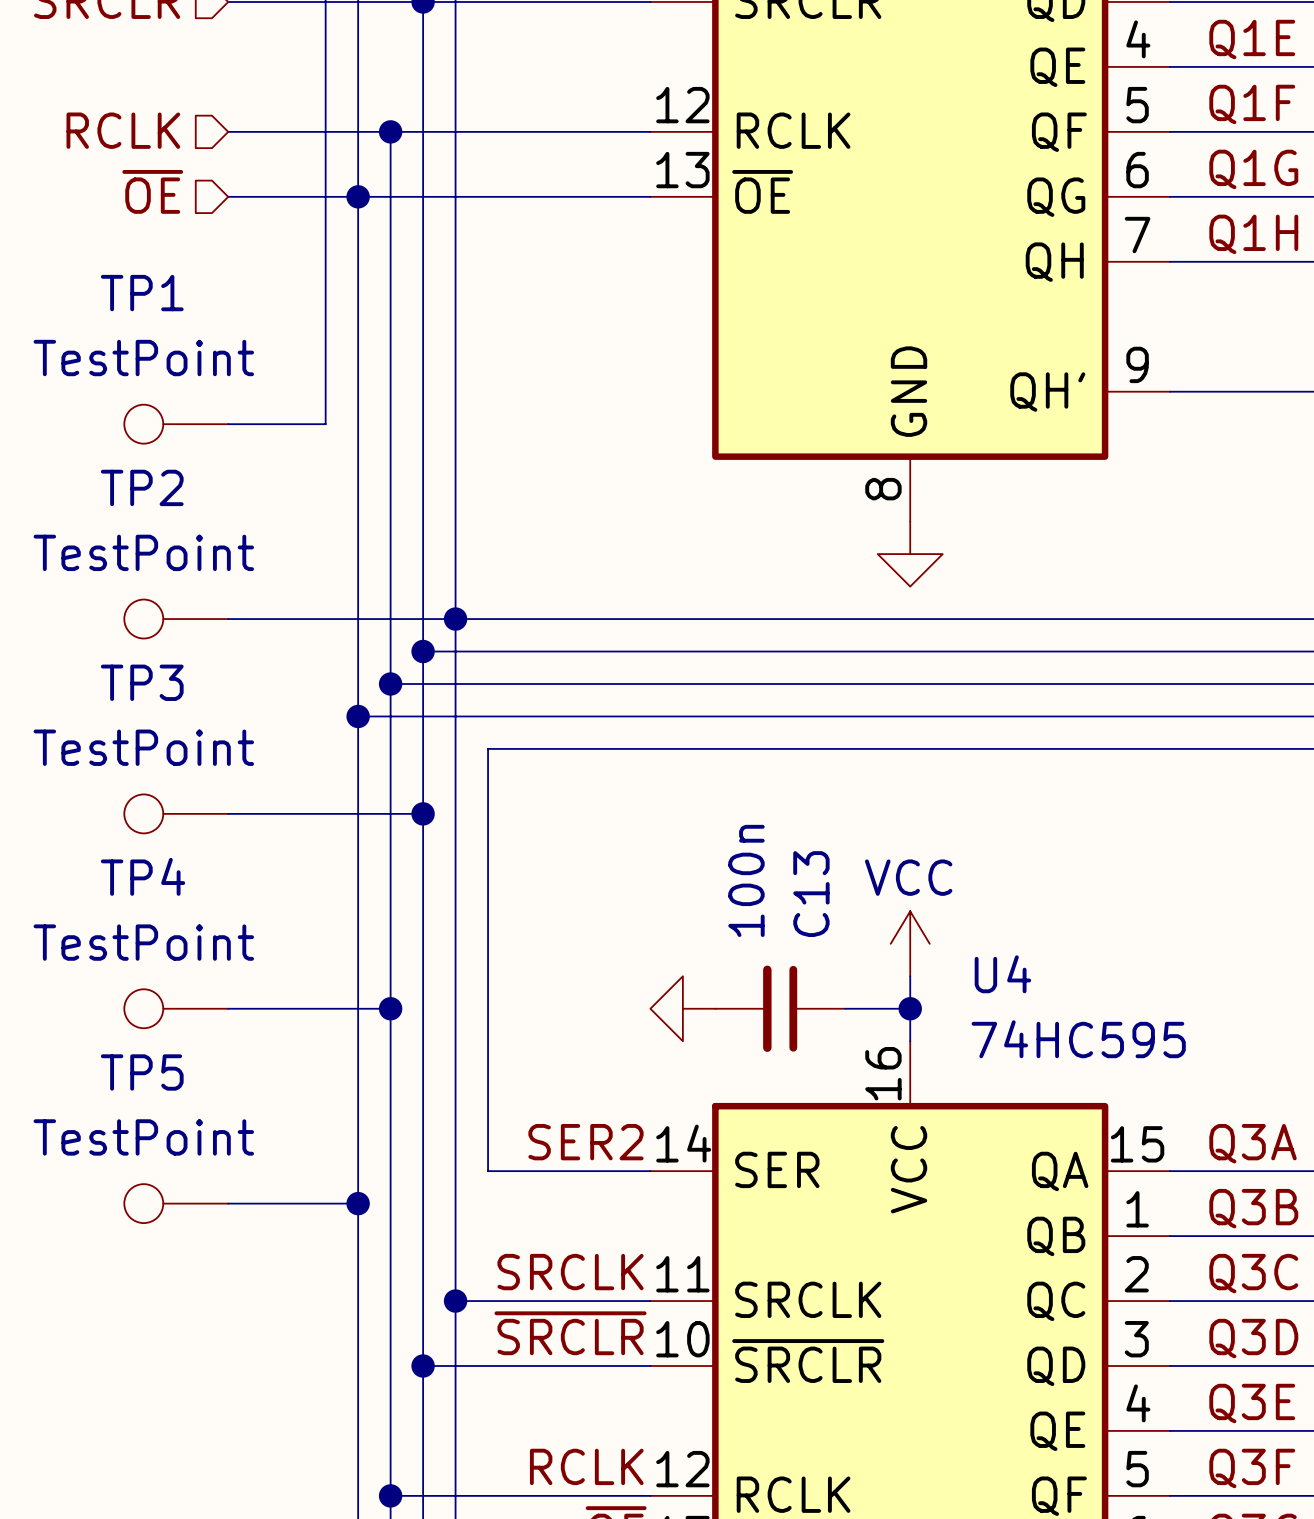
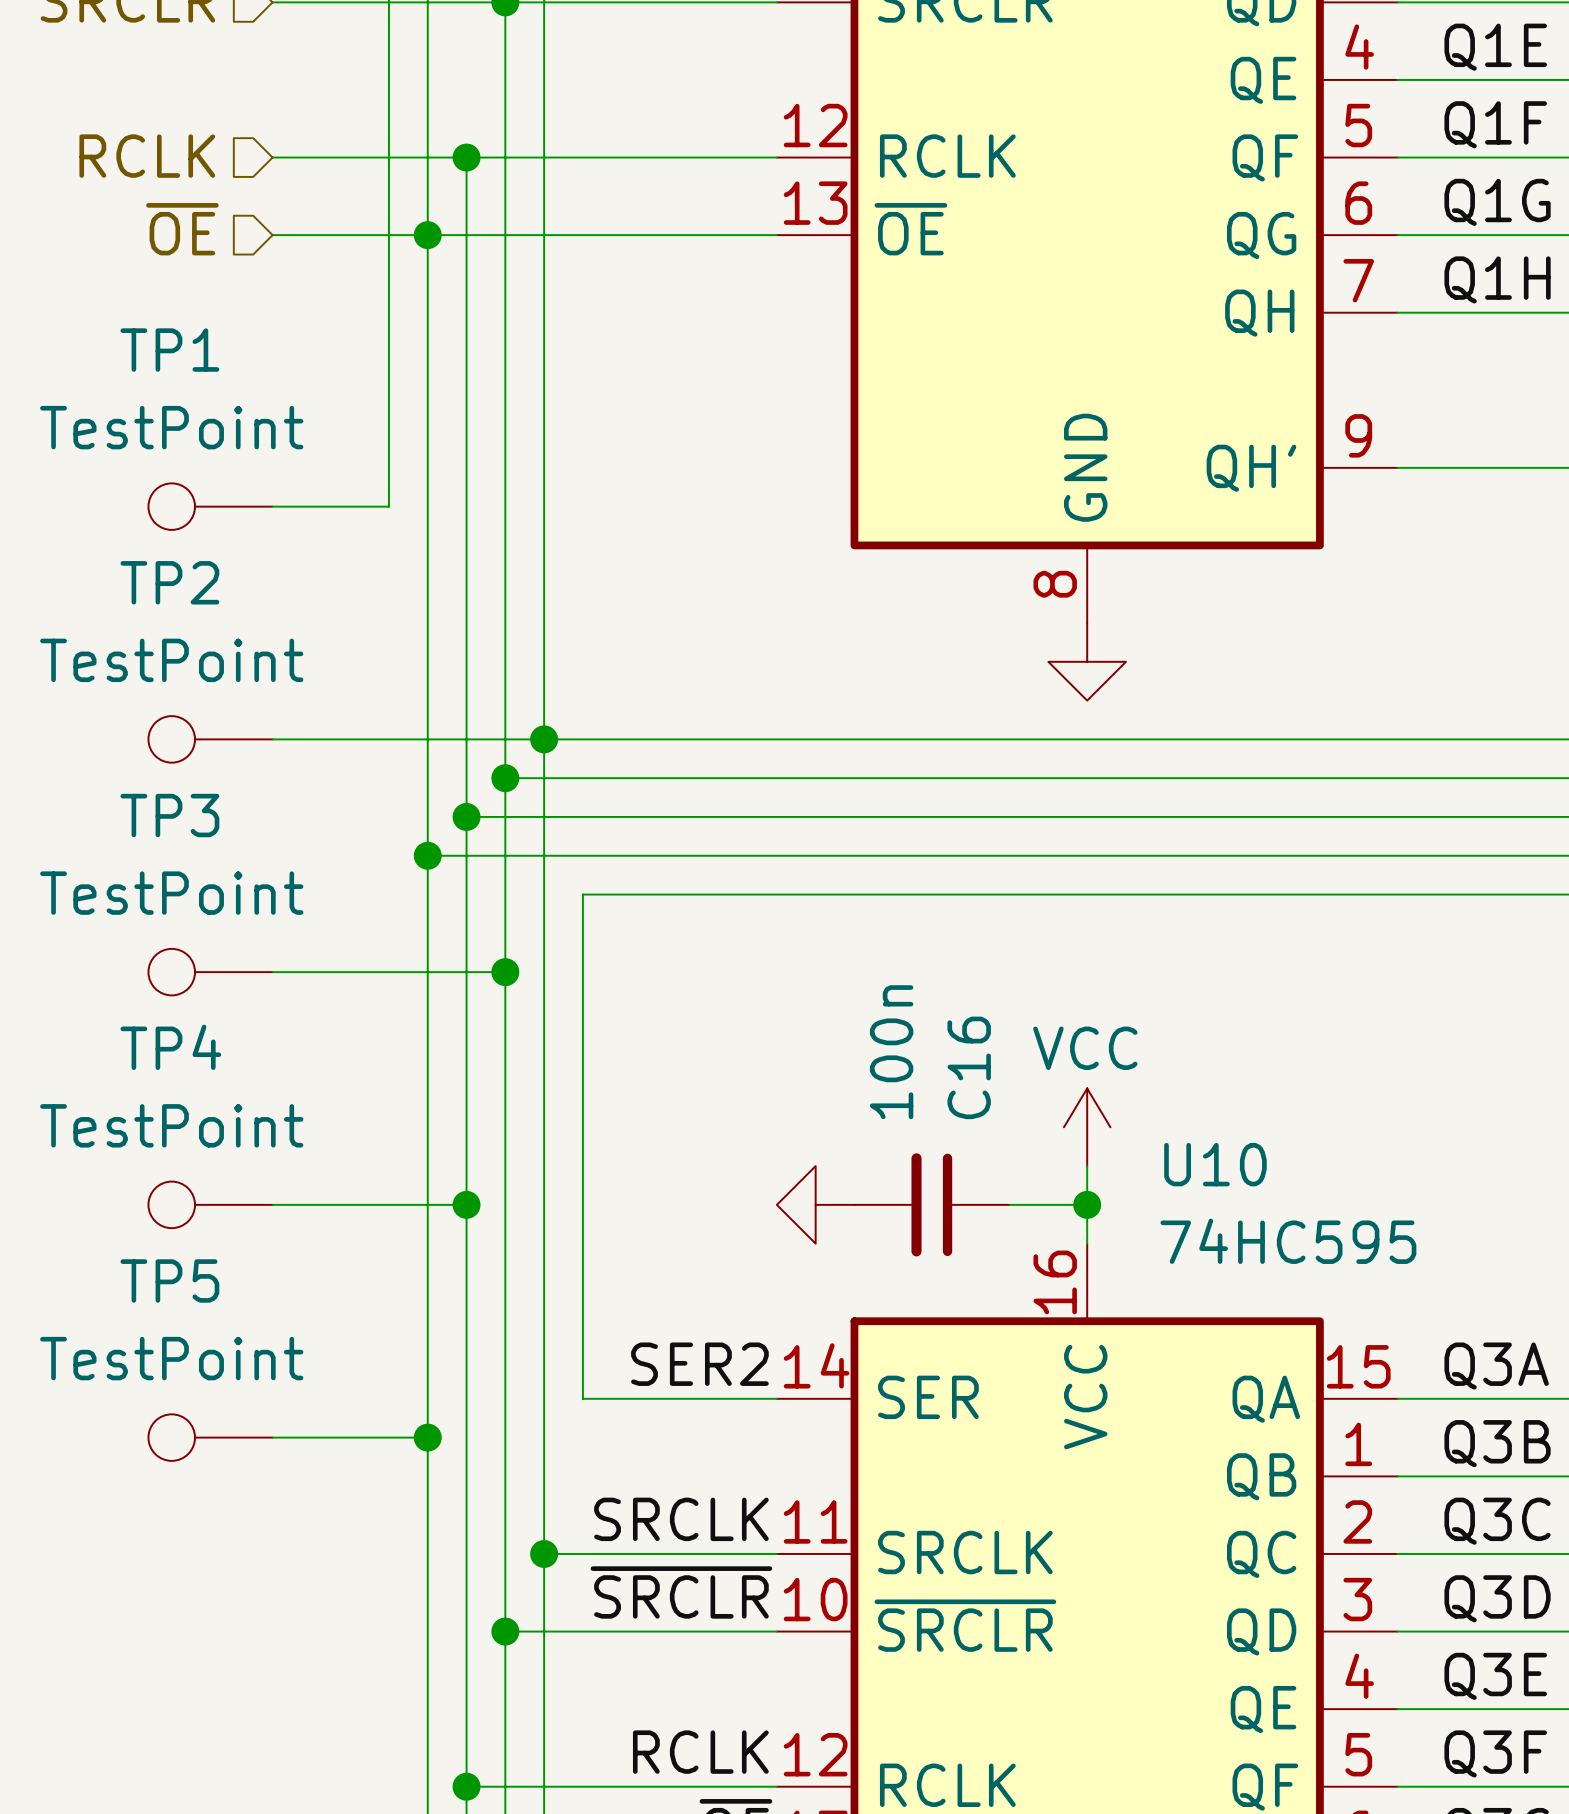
C13 name: C13 (811, 894) -> C16 (969, 1067)
U4 name: U4 (1002, 974) -> U10 (1215, 1164)

